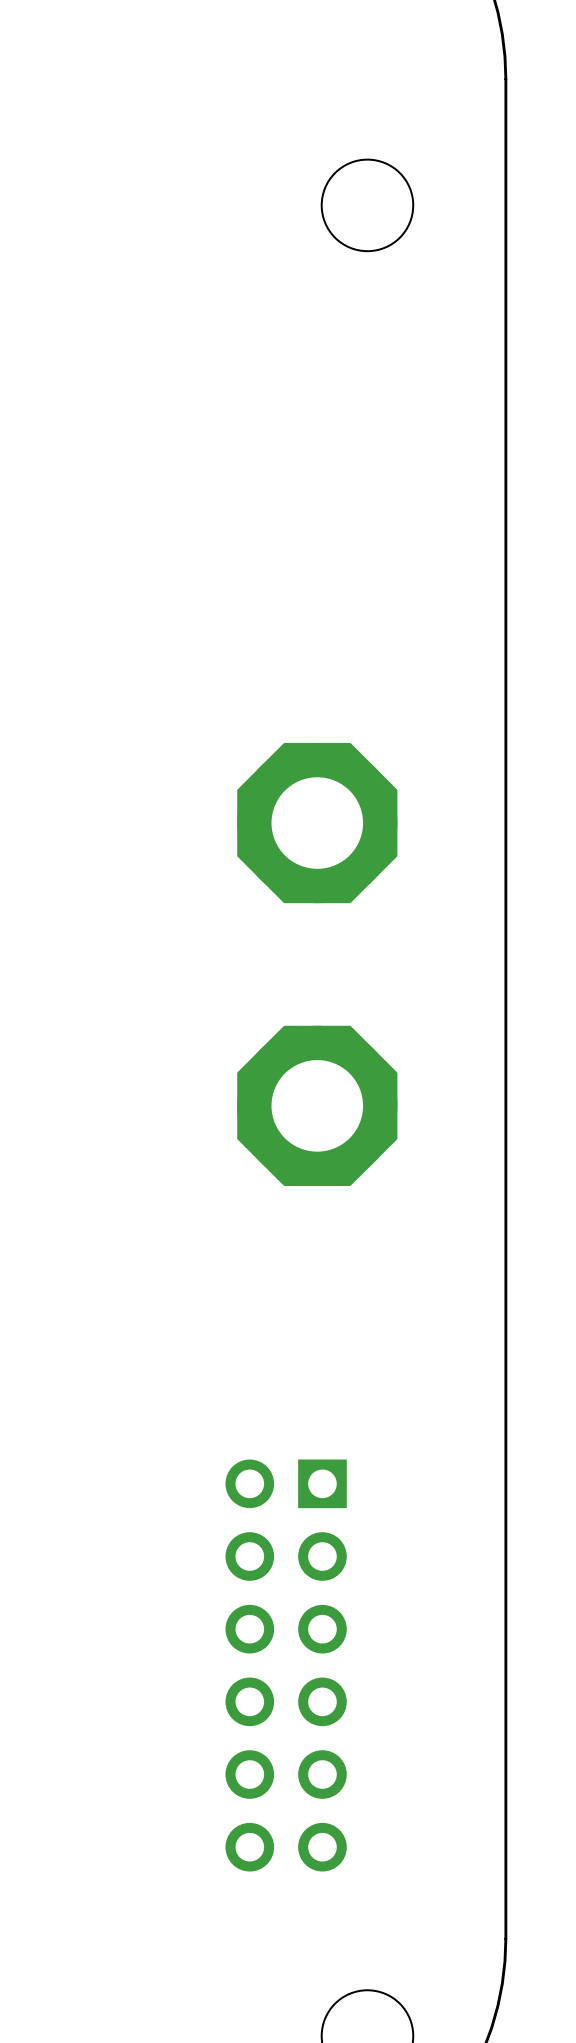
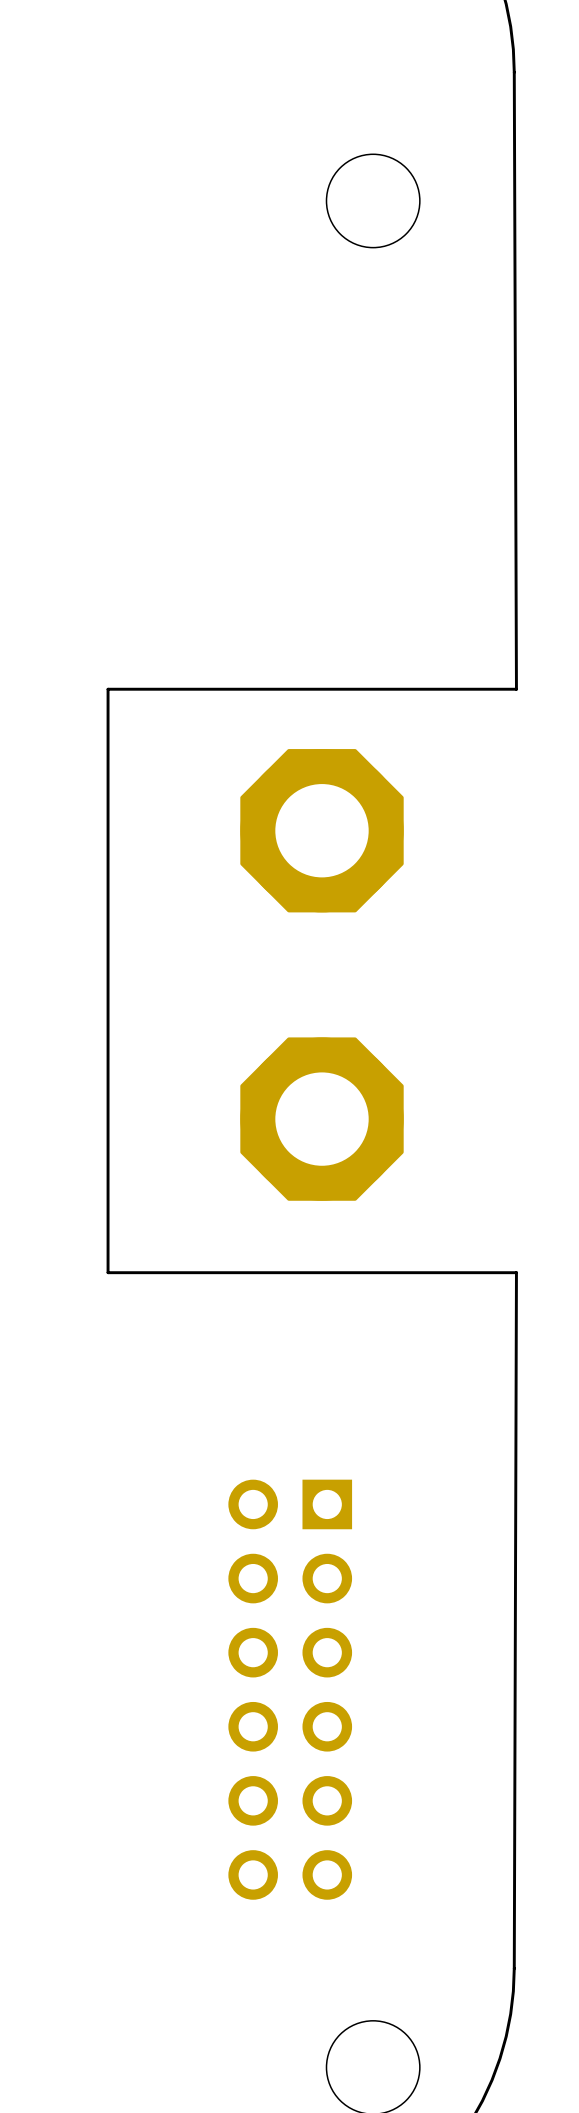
board edge: (505, 79) (505, 1938) -> (514, 72) (516, 689) (108, 689) (108, 1272) (516, 1272) (514, 1968)

